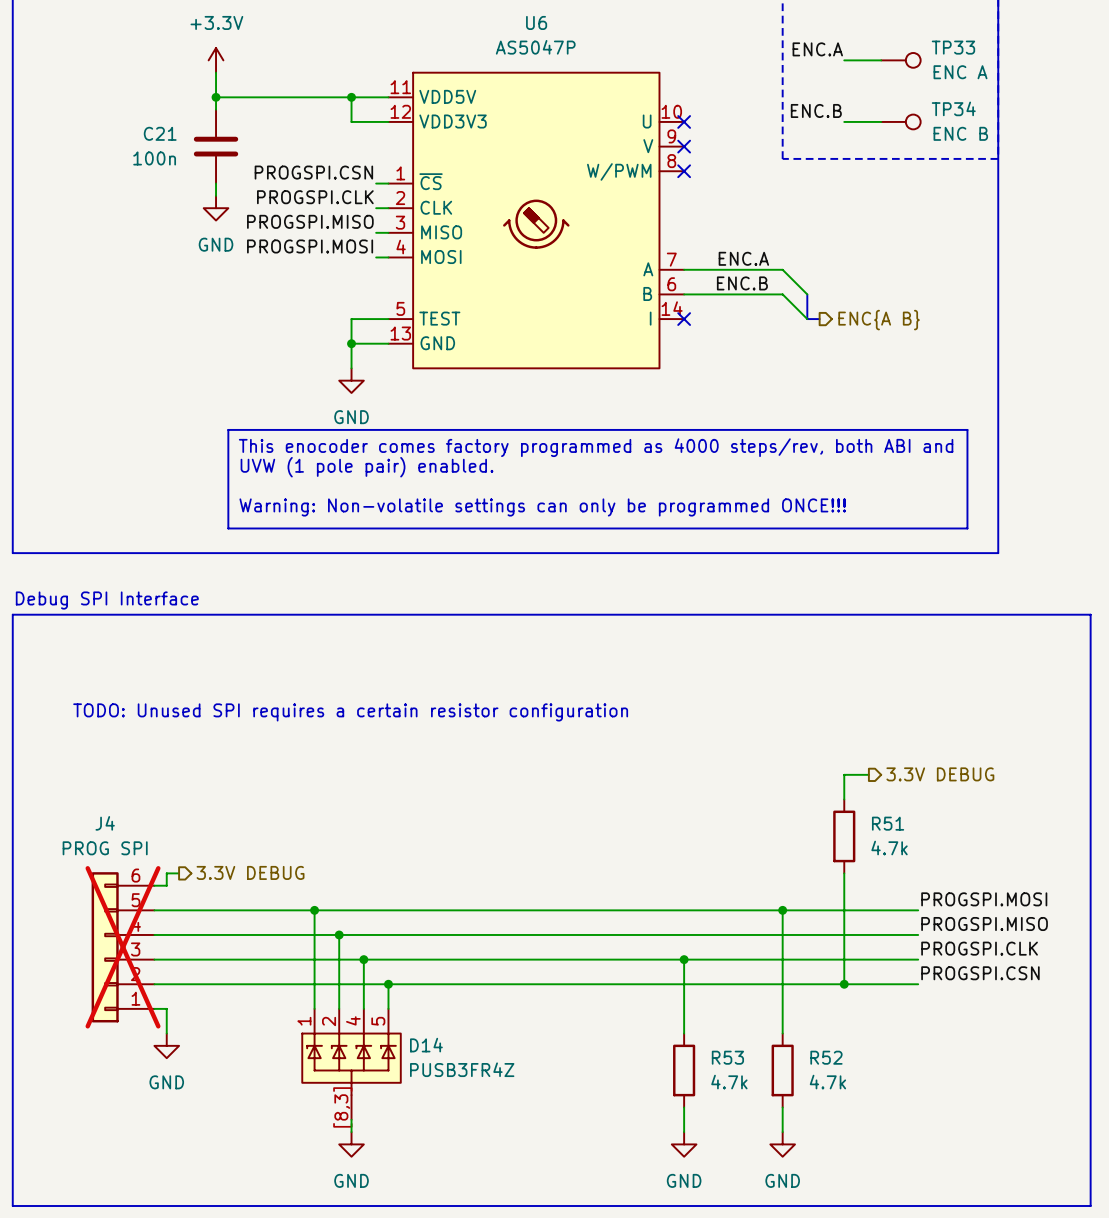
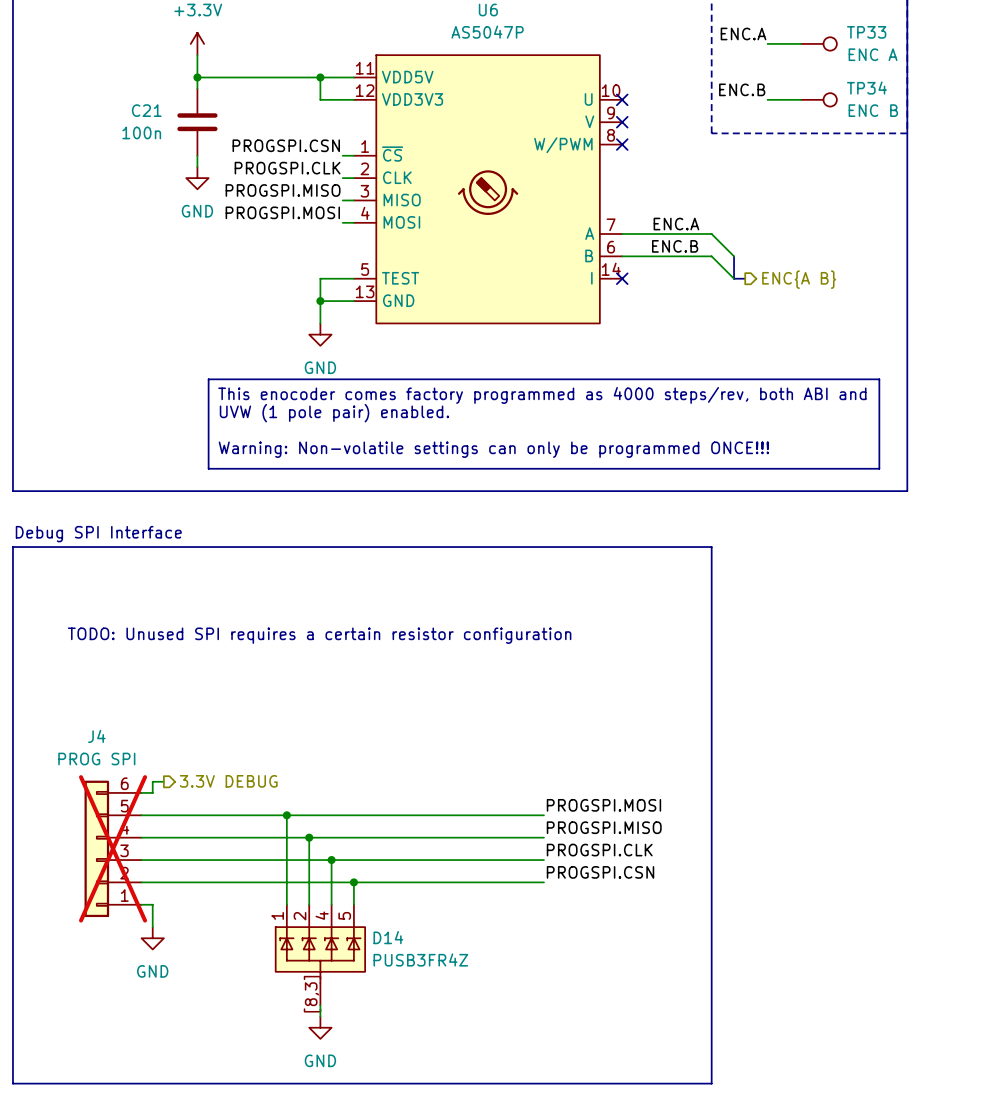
line: (782, 614) (1090, 614) (1090, 1205) (782, 1205) -> (711, 547) (711, 1083)
wire: (868, 774) (844, 774) (844, 799) -> none
hierarchical label: 3.3V DEBUG (940, 774) -> none
R51: 4.7k (844, 836) -> none
wire: (844, 873) (844, 984) -> none
label: none -> PROGSPI.MOSI (603, 805)
label: PROGSPI.MOSI (984, 899) -> none
wire: (597, 910) (918, 910) -> none
junction: (782, 910) -> none
label: none -> PROGSPI.MISO (604, 827)
label: PROGSPI.MISO (984, 923) -> none
wire: (597, 934) (918, 934) -> none
label: none -> PROGSPI.CLK (599, 850)
label: PROGSPI.CLK (979, 948) -> none
wire: (597, 959) (918, 959) -> none
wire: (684, 959) (684, 1033) -> none
junction: (684, 959) -> none
label: none -> PROGSPI.CSN (600, 872)
label: PROGSPI.CSN (980, 973) -> none
wire: (597, 984) (918, 984) -> none
junction: (844, 984) -> none
R53: 4.7k (684, 1070) -> none
R52: 4.7k (782, 1070) -> none
wire: (684, 1107) (684, 1132) -> none
power symbol: GND (684, 1144) -> none
power symbol: GND (782, 1144) -> none

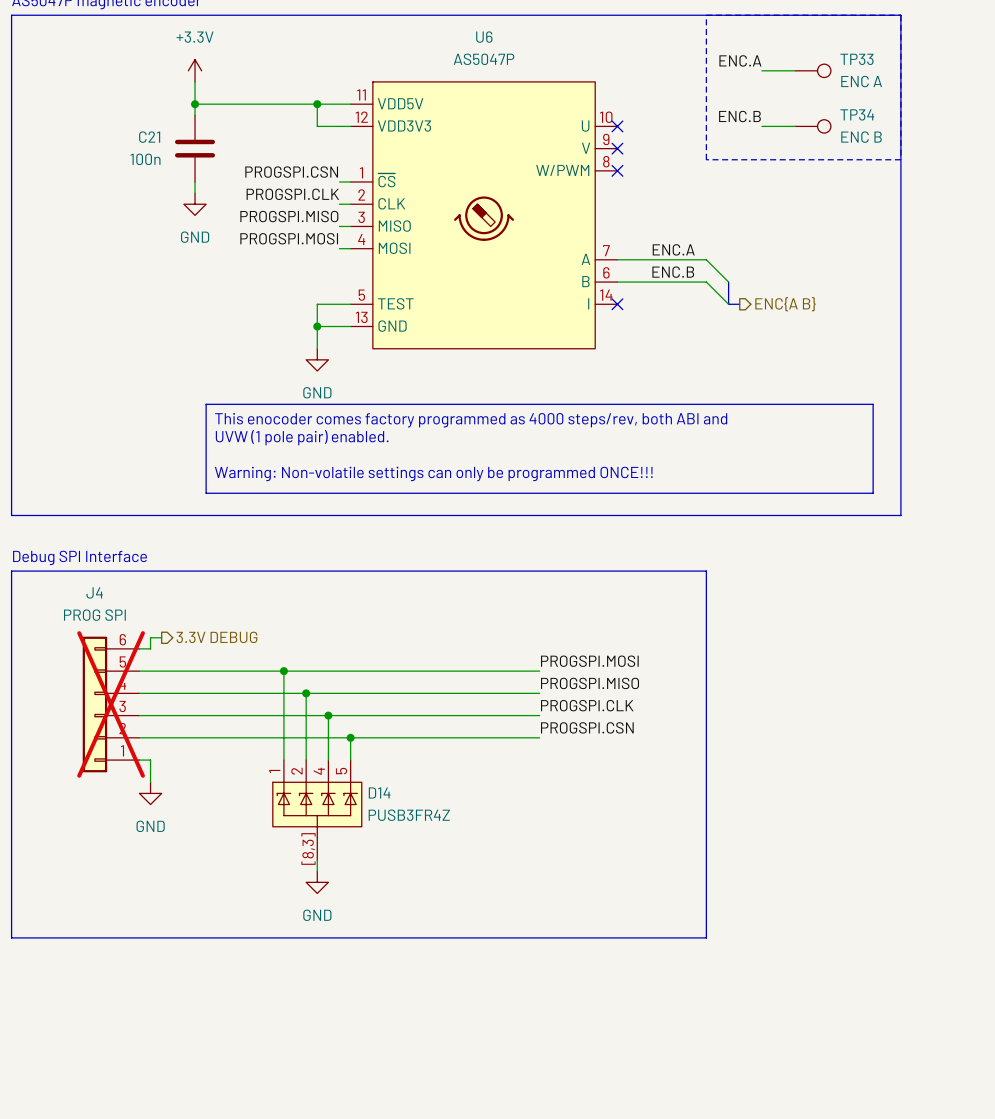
text: TODO: Unused SPI requires a certain resistor configuration (319, 635) -> none
junction: none -> (283, 671)
junction: none -> (306, 693)
junction: none -> (328, 715)
junction: none -> (350, 737)
power symbol: none -> GND (150, 793)
wire: (163, 781) (152, 781) (152, 792) (141, 792) -> (161, 637) (150, 637) (150, 648) (139, 648)
hierarchical label position: 3.3V DEBUG (228, 781) -> 3.3V DEBUG (216, 637)
label position: PROGSPI.MOSI (603, 805) -> PROGSPI.MOSI (589, 661)
wire: (141, 815) (543, 815) -> (139, 671) (539, 671)
wire: (286, 815) (286, 904) -> (283, 671) (283, 760)
junction: (286, 815) -> none
label position: PROGSPI.MISO (604, 827) -> PROGSPI.MISO (590, 683)
wire: (141, 837) (543, 837) -> (139, 693) (539, 693)
wire: (309, 837) (309, 904) -> (306, 693) (306, 760)
junction: (309, 837) -> none
J4 position: (113, 848) -> (111, 704)
label position: PROGSPI.CLK (599, 850) -> PROGSPI.CLK (587, 705)
wire: (141, 860) (543, 860) -> (139, 715) (539, 715)
power symbol: none -> GND (317, 882)
wire: (331, 860) (331, 904) -> (328, 715) (328, 760)
junction: (331, 860) -> none
label position: PROGSPI.CSN (600, 872) -> PROGSPI.CSN (587, 727)
wire: (141, 882) (543, 882) -> (139, 737) (539, 737)
wire: (353, 882) (353, 904) -> (350, 737) (350, 760)
junction: (353, 882) -> none
wire: (141, 904) (152, 904) (152, 927) -> (139, 760) (150, 760) (150, 782)
line: (12, 915) (12, 1083) (711, 1083) (711, 915) -> (11, 937) (706, 937)
power symbol: GND (152, 938) -> none
D14 position: (320, 955) -> (317, 810)
wire: (320, 1005) (320, 1016) -> (317, 860) (317, 871)
power symbol: GND (320, 1027) -> none

